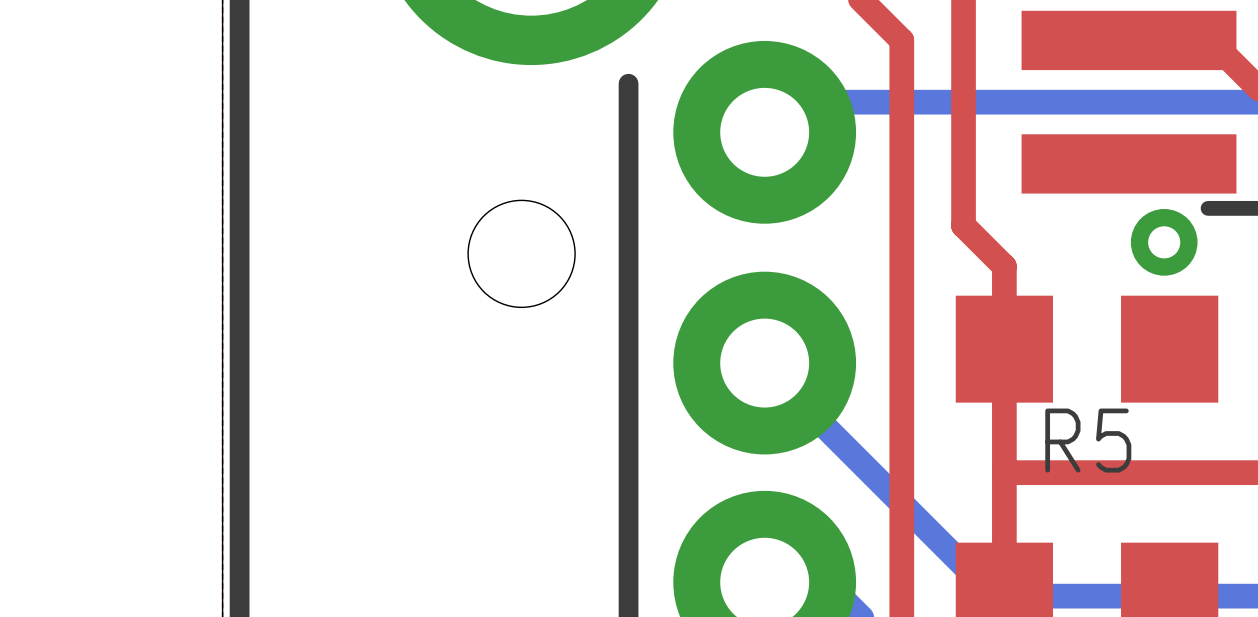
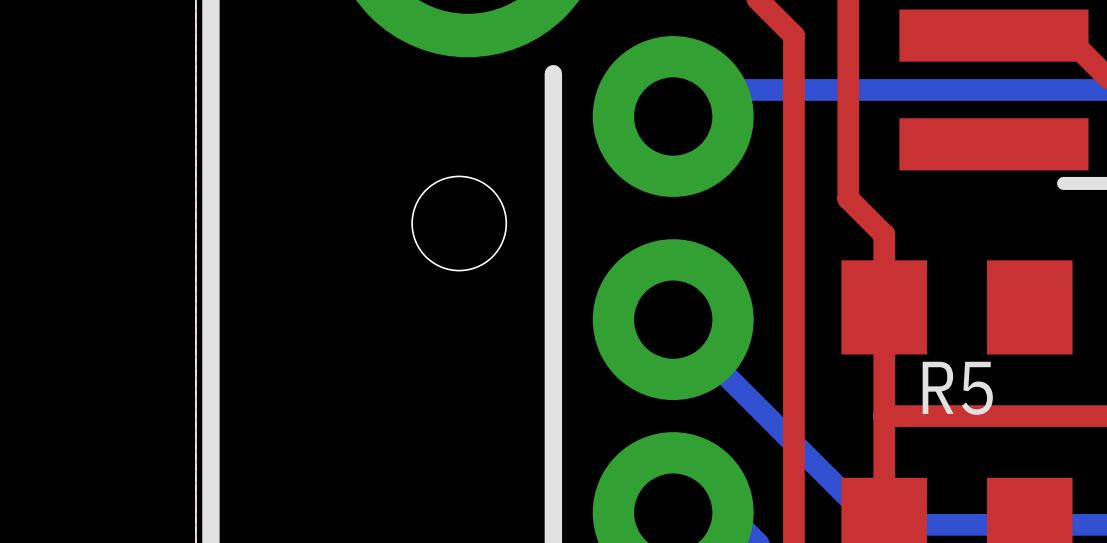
via: (1164, 242) -> none

